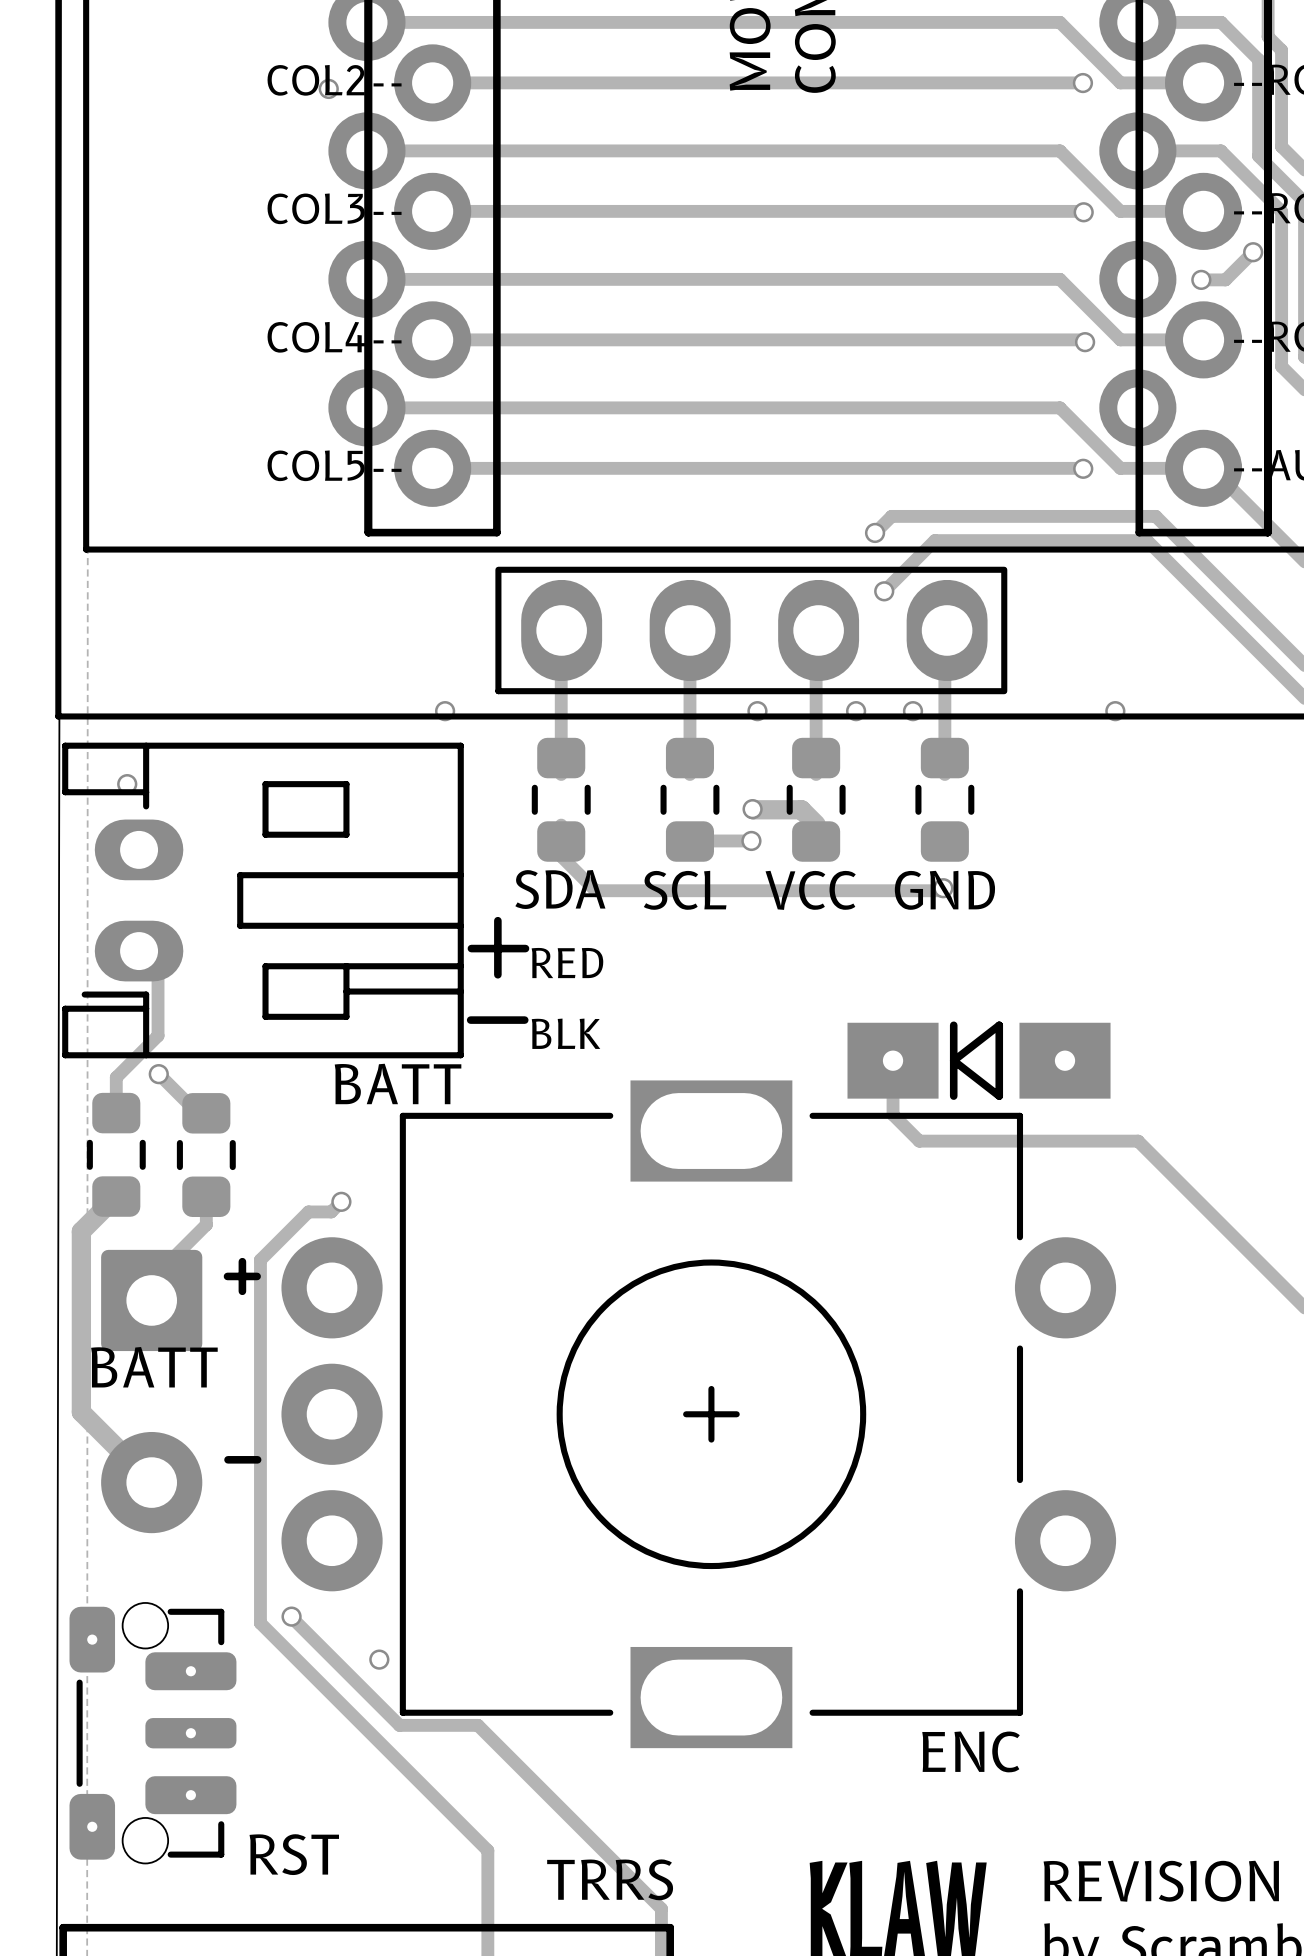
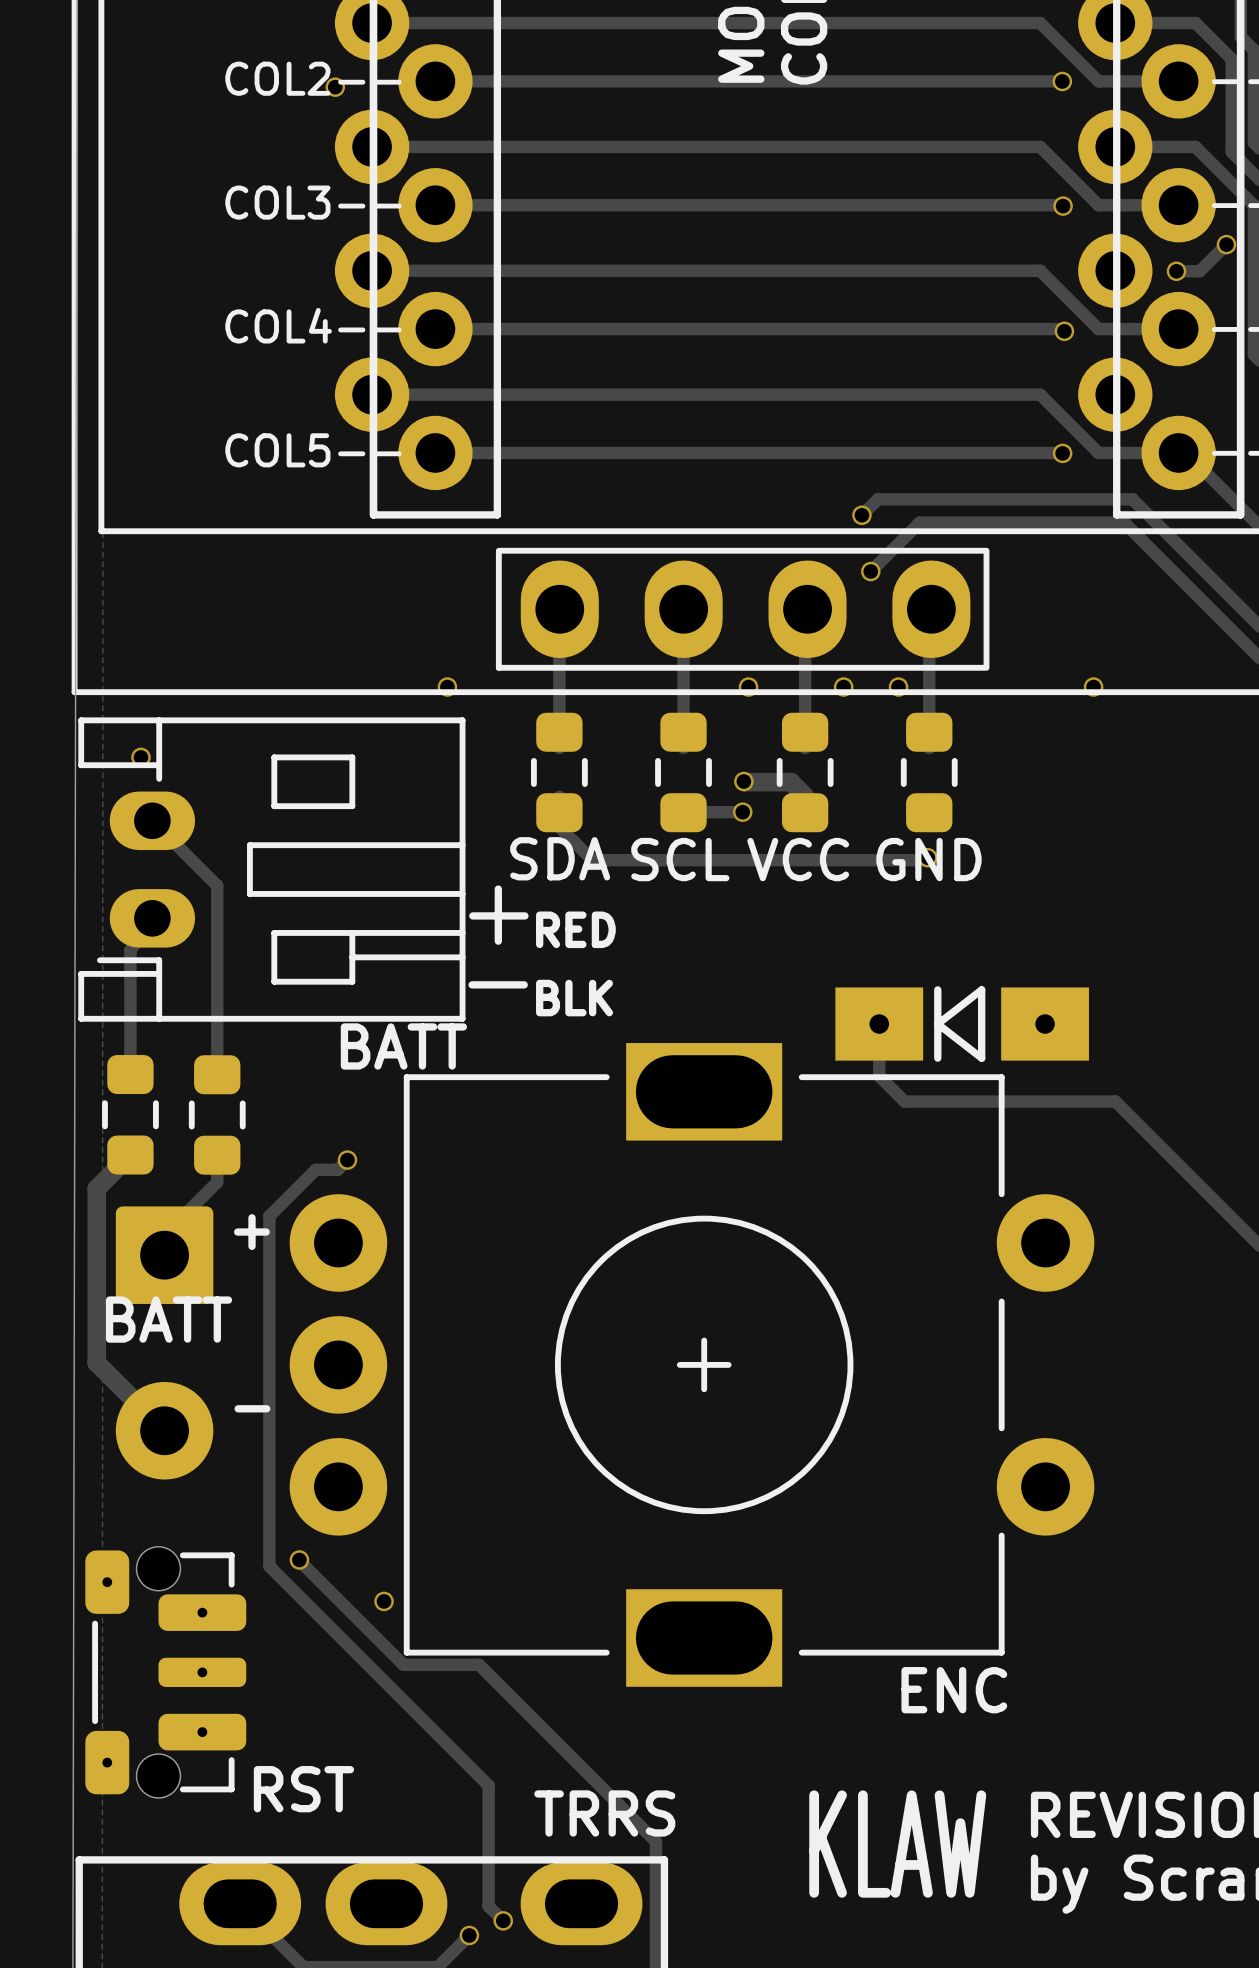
track: none -> (152, 820) (217, 885) (217, 1074)
track: (158, 970) (158, 1035) (116, 1077) -> (152, 918) (130, 950) (130, 1040)
track: (158, 1074) (197, 1112) -> none
via: (158, 1074) -> none

